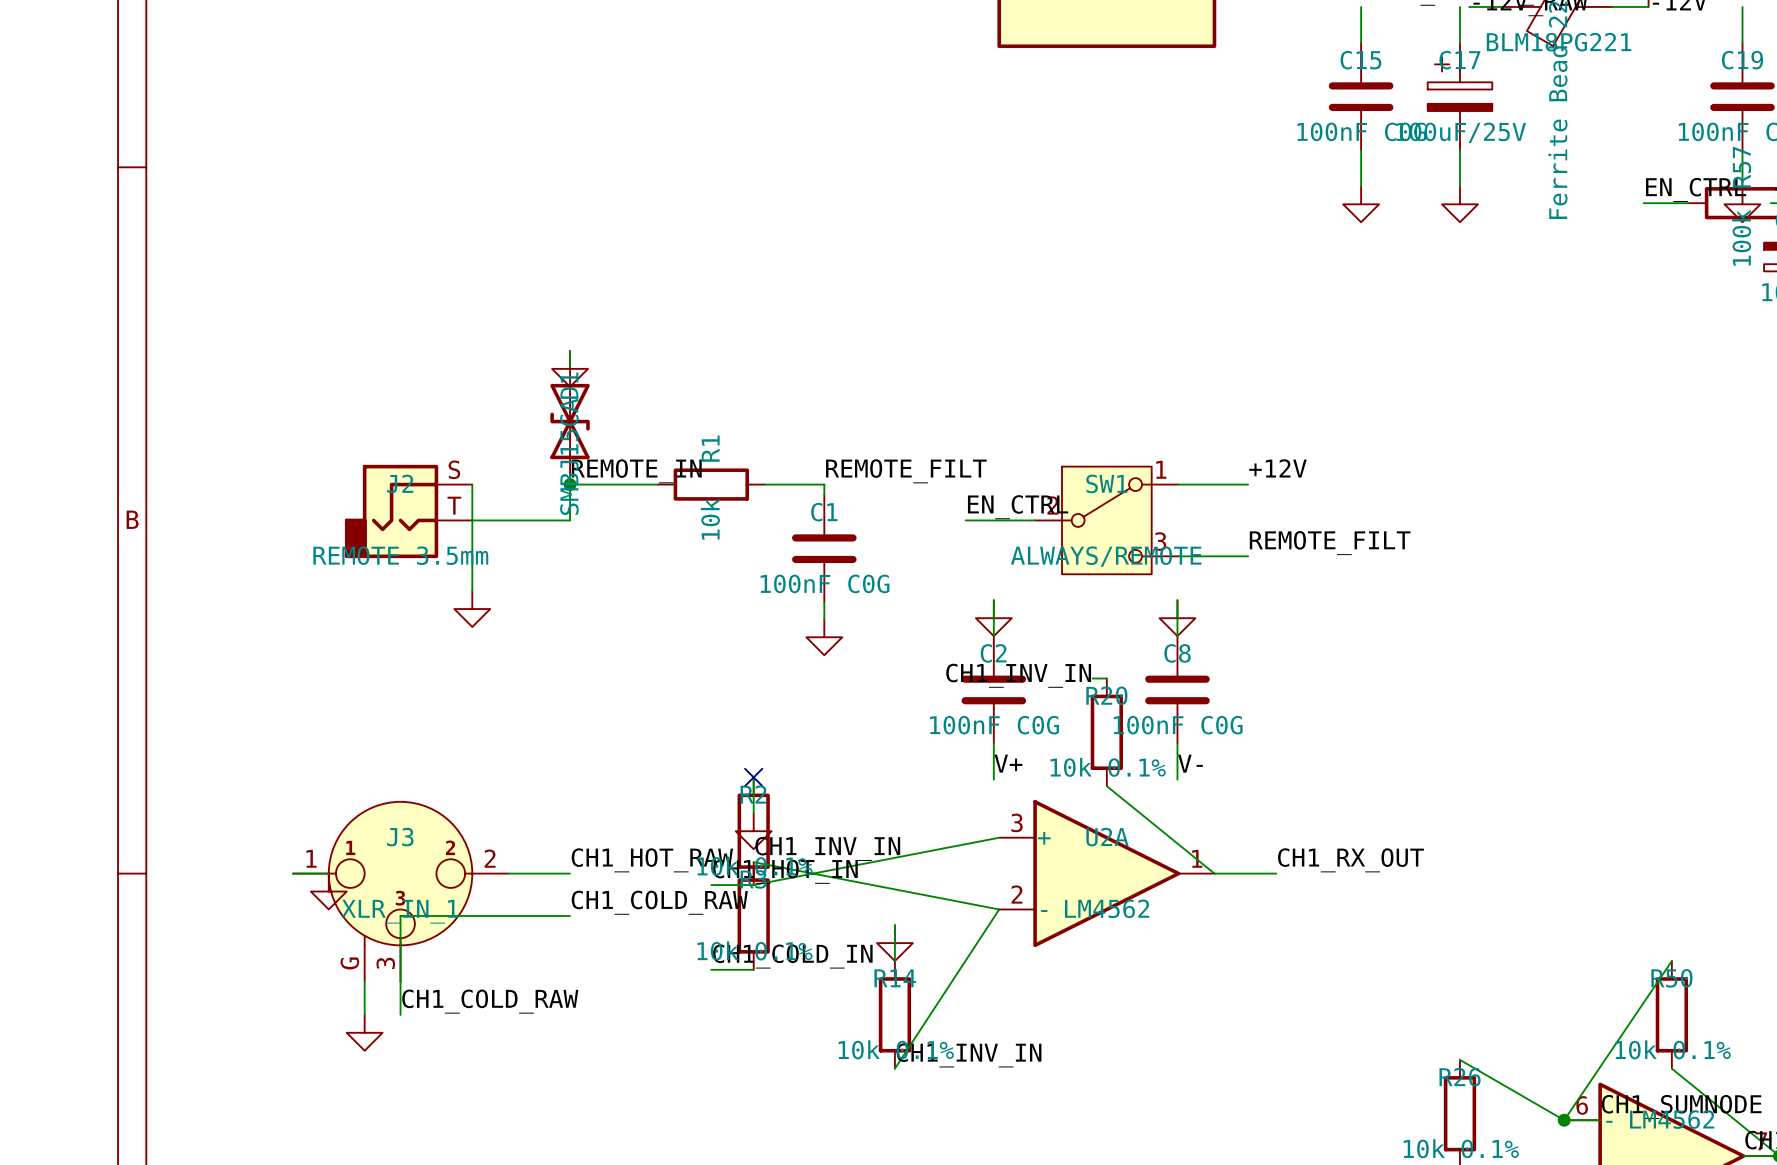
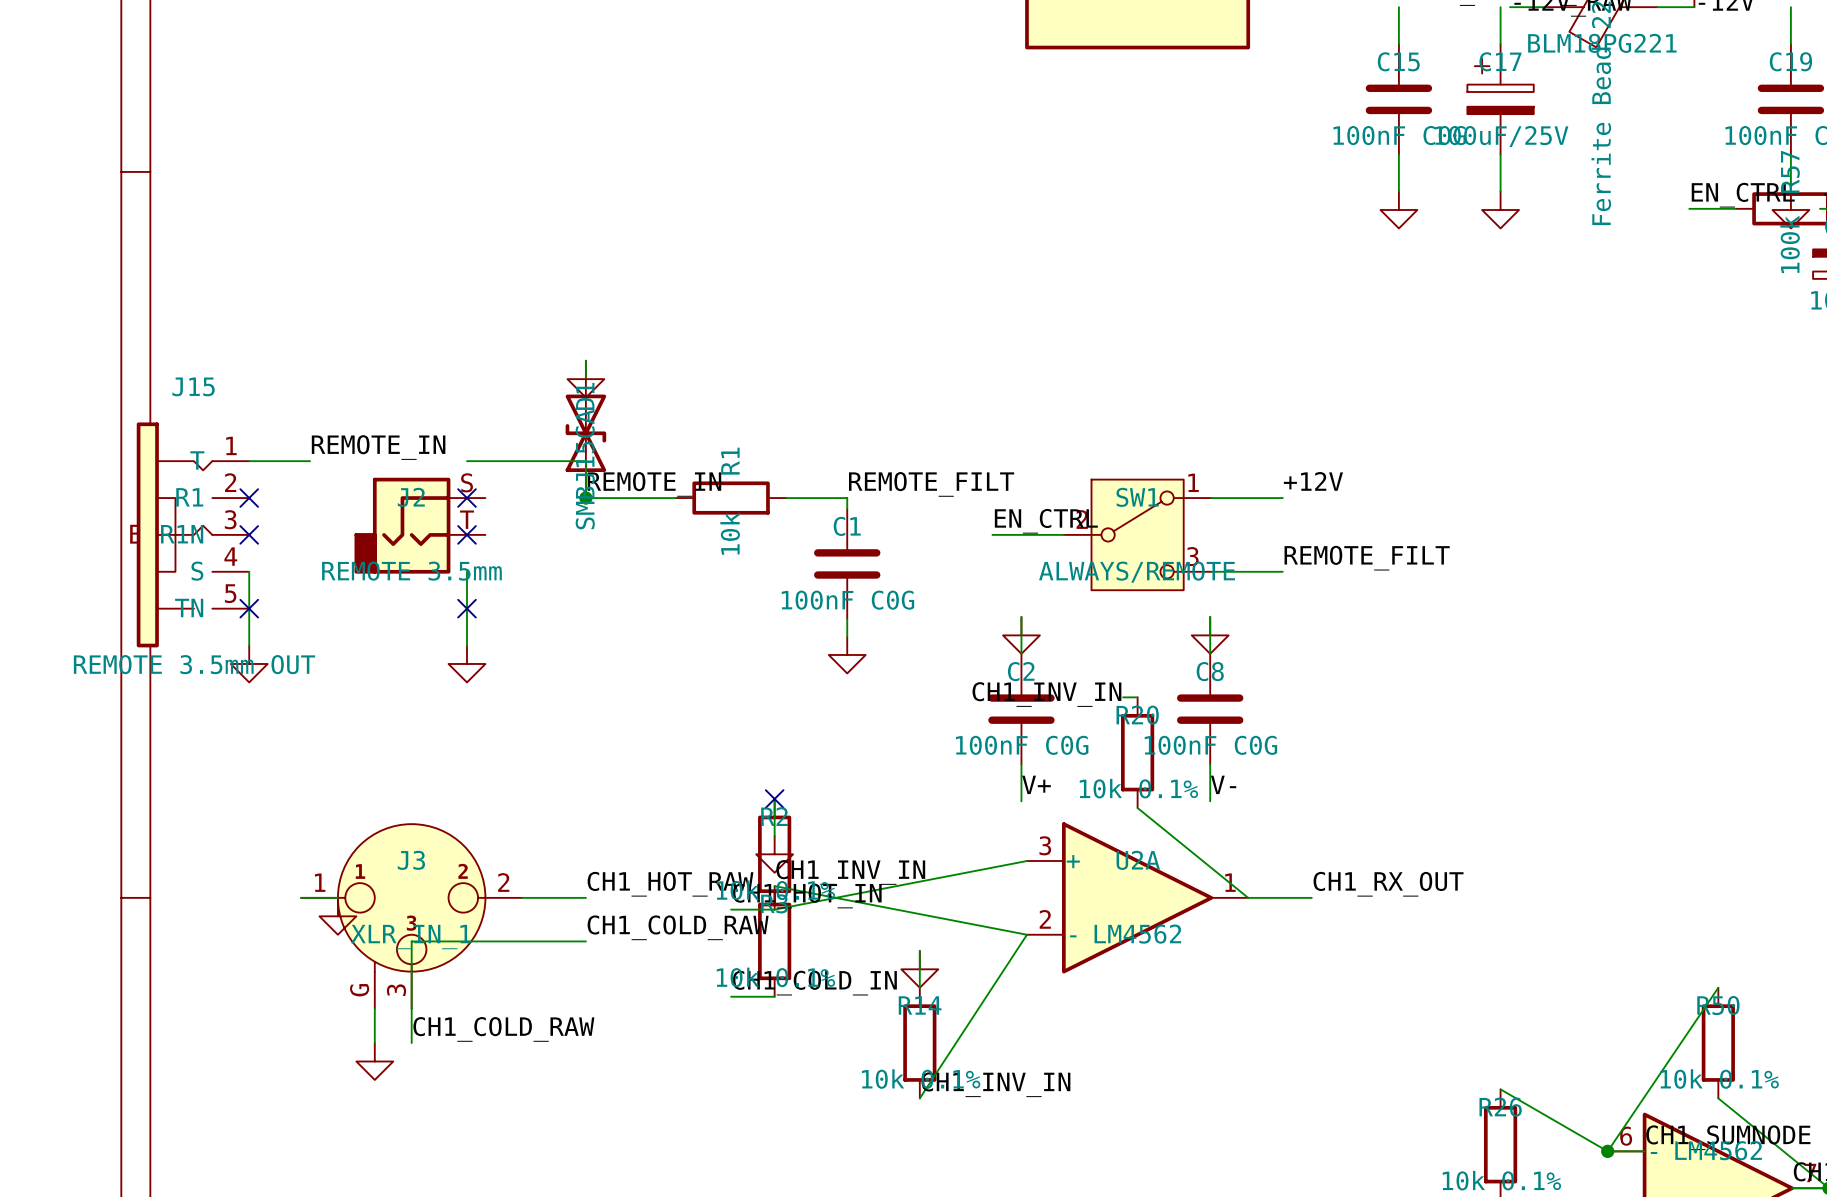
label: none -> REMOTE_IN (378, 447)
wire: none -> (249, 461) (310, 461)
wire: none -> (466, 461) (585, 461) (585, 488)
no-connect mark: none -> (249, 498)
no-connect mark: none -> (466, 498)
wire: (472, 484) (472, 591) -> none
wire: (570, 484) (570, 520) (472, 520) -> none
J15: none -> REMOTE 3.5mm OUT (192, 534)
no-connect mark: none -> (249, 534)
no-connect mark: none -> (466, 534)
wire: none -> (249, 571) (249, 645)
wire: none -> (466, 571) (466, 645)
no-connect mark: none -> (249, 608)
no-connect mark: none -> (466, 608)
power symbol position: (472, 609) -> (466, 663)
power symbol: none -> (249, 663)

